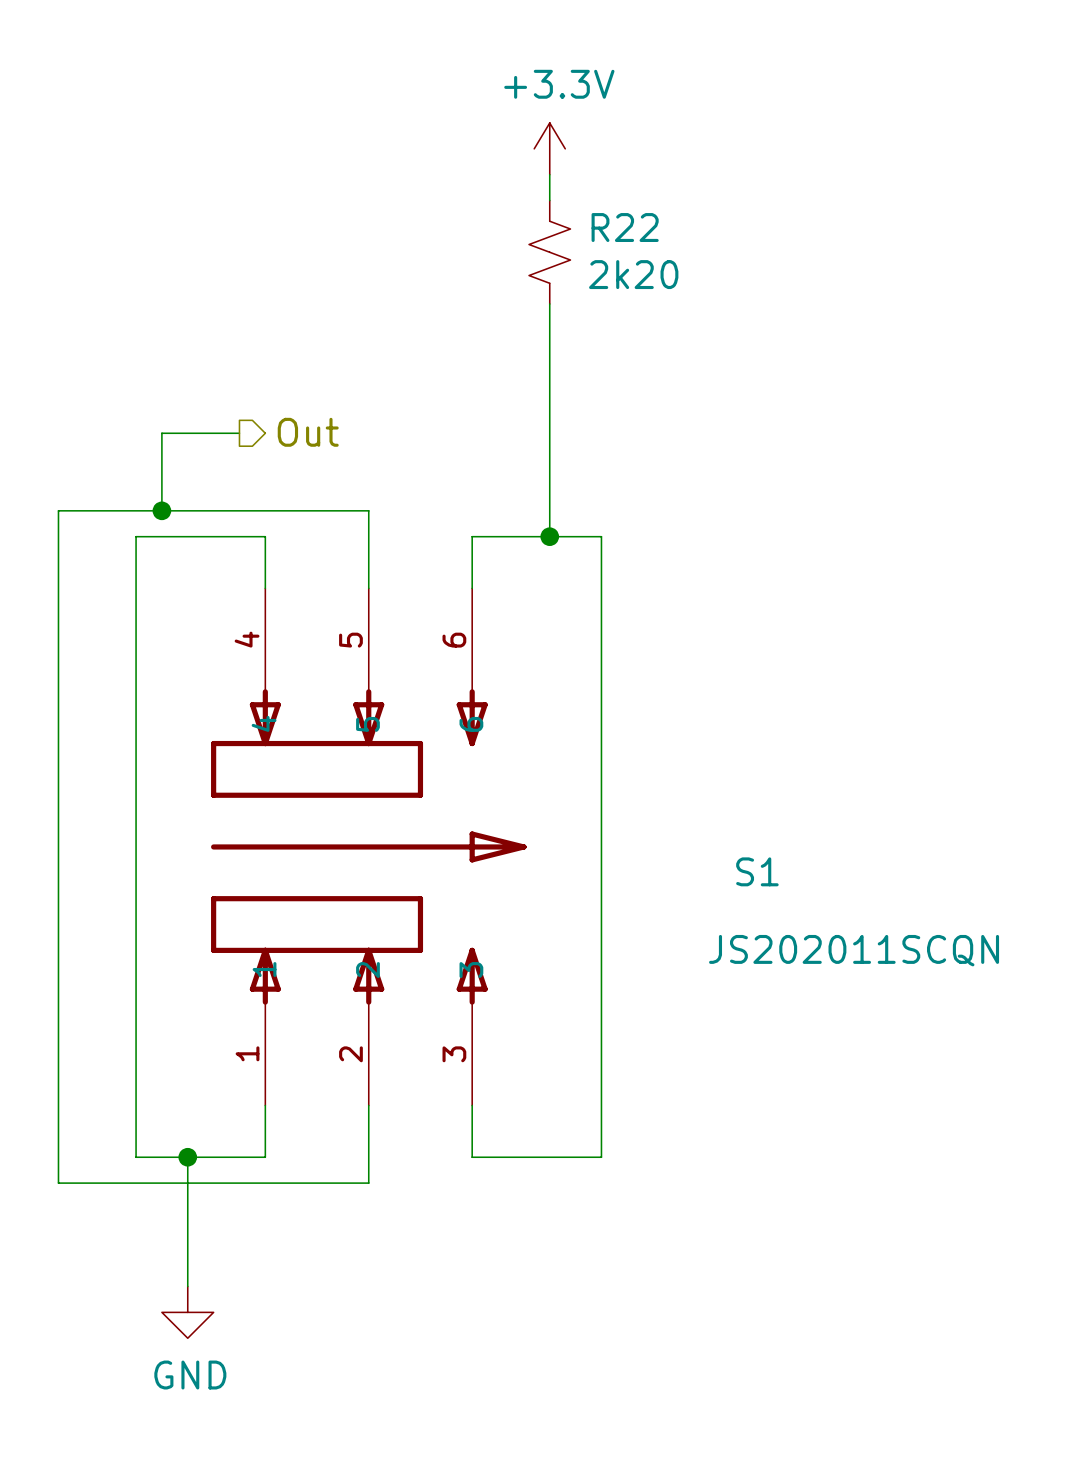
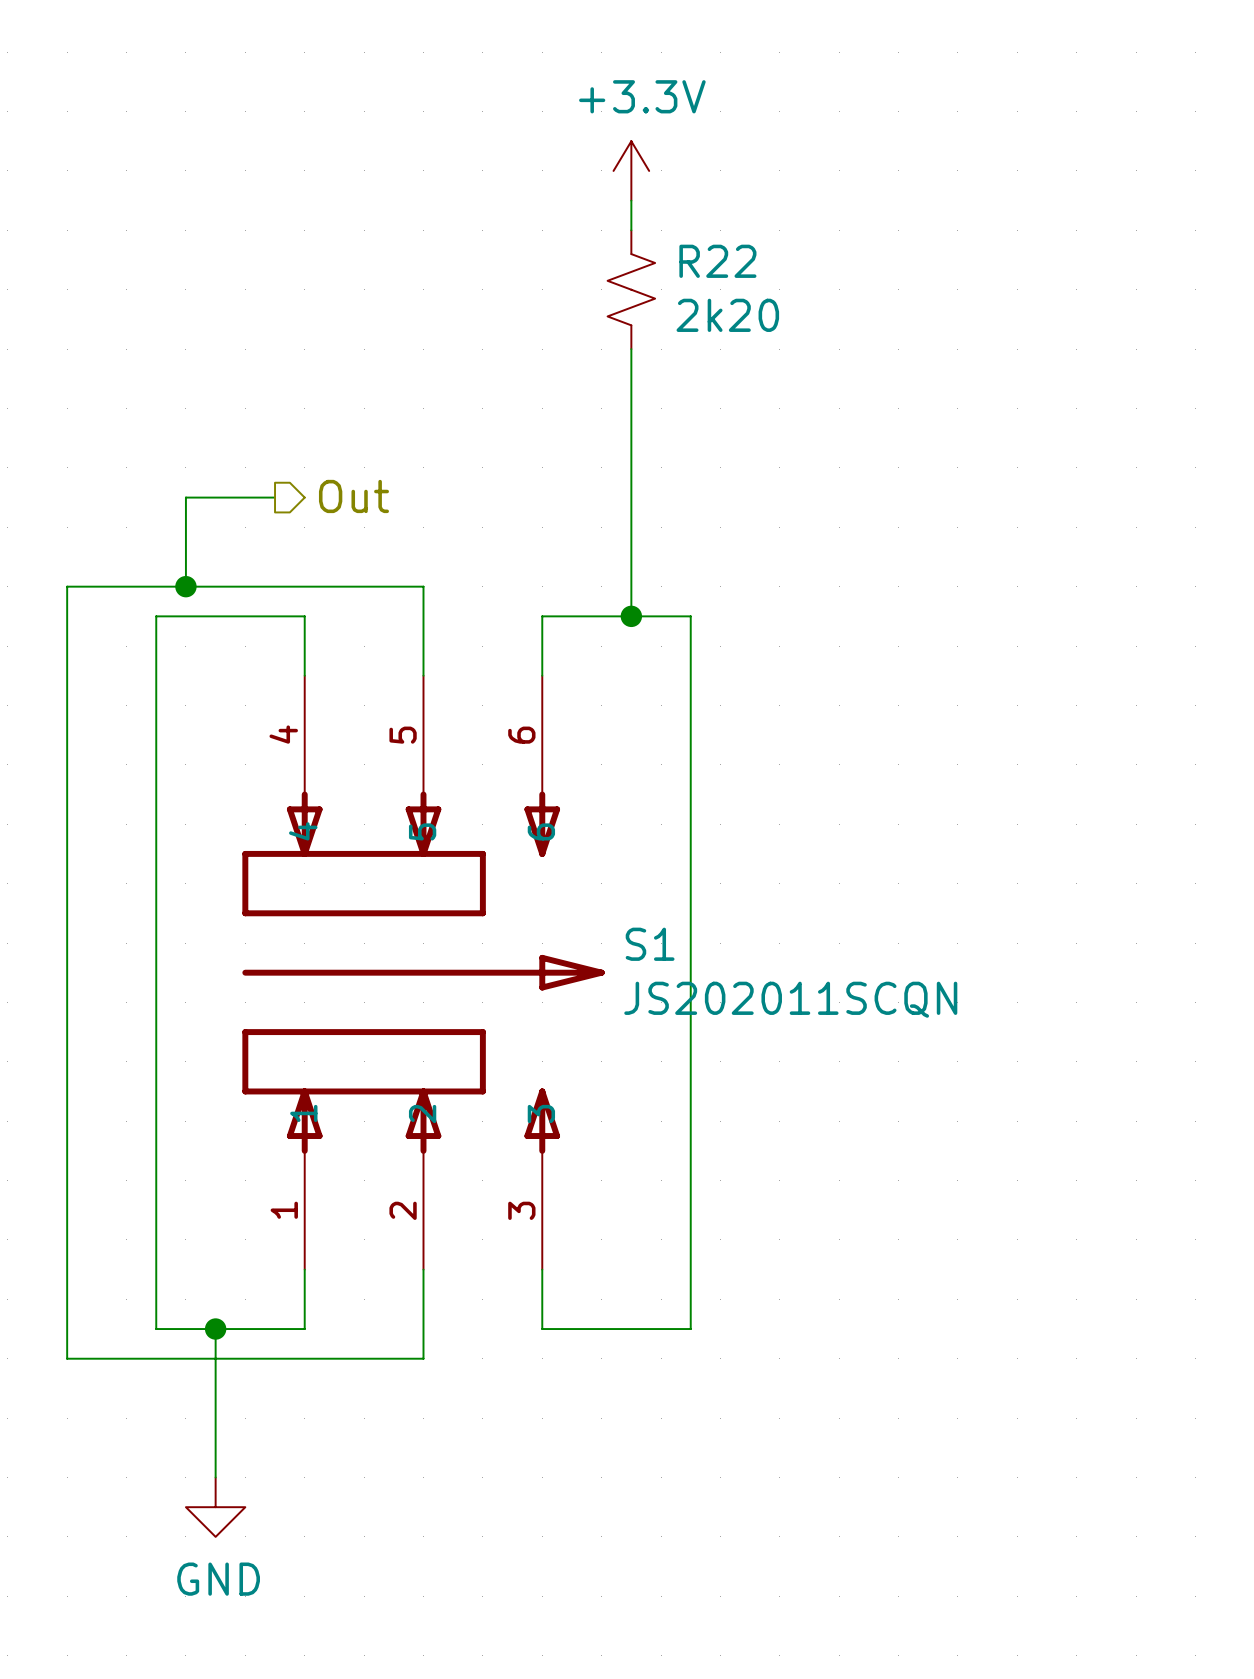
S1 name position: S1 (757, 871) -> S1 (650, 944)
S1 value position: JS202011SCQN (854, 950) -> JS202011SCQN (790, 999)

